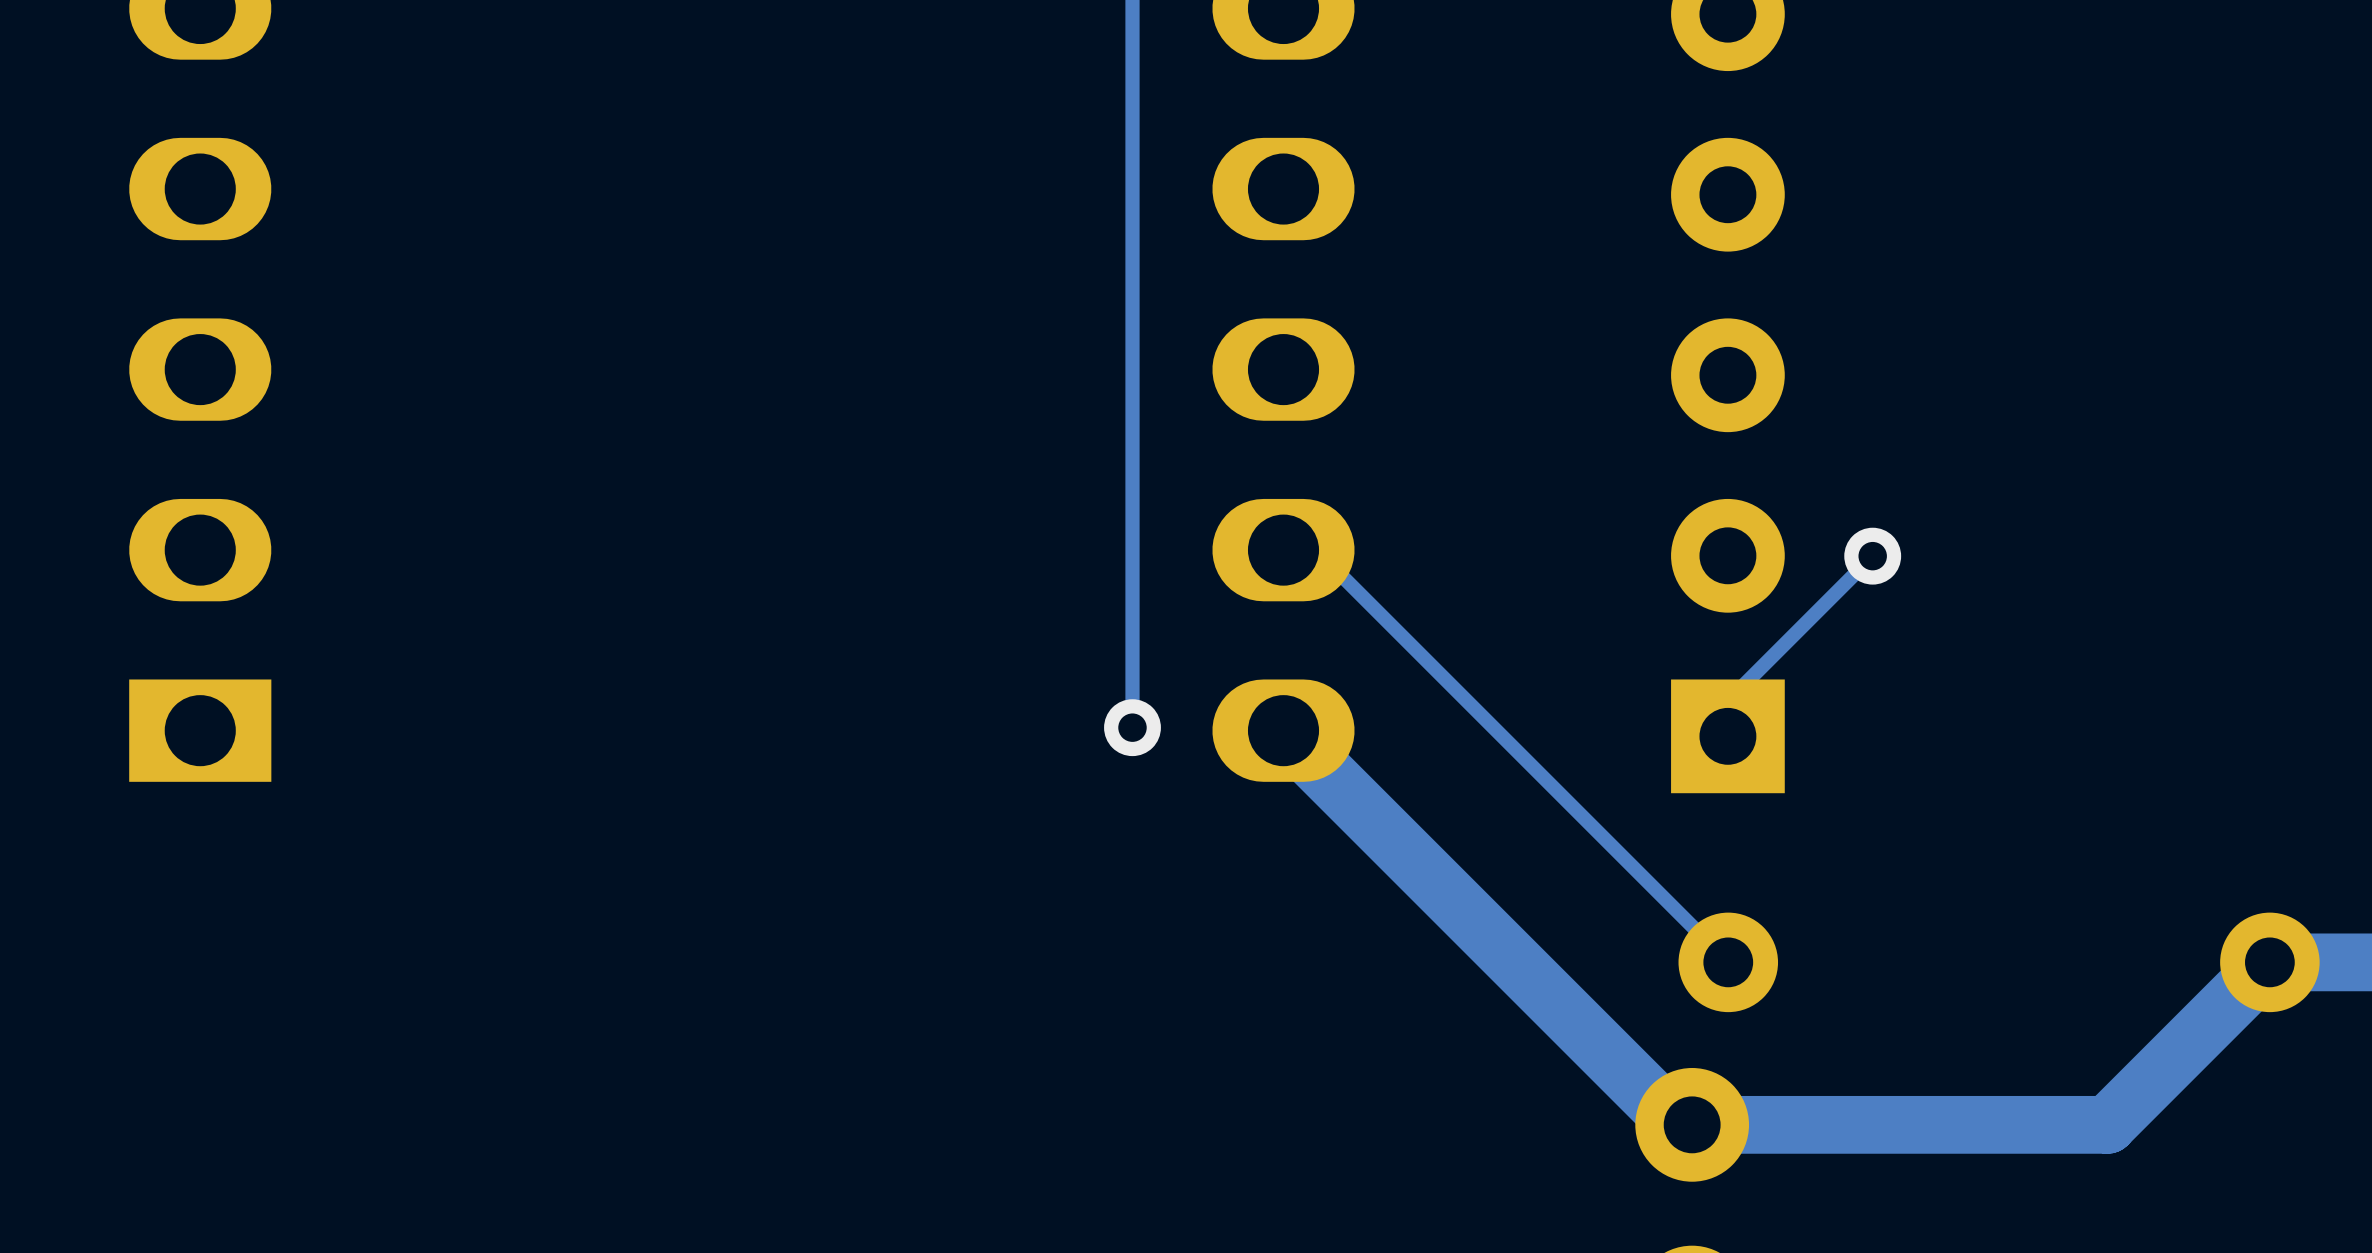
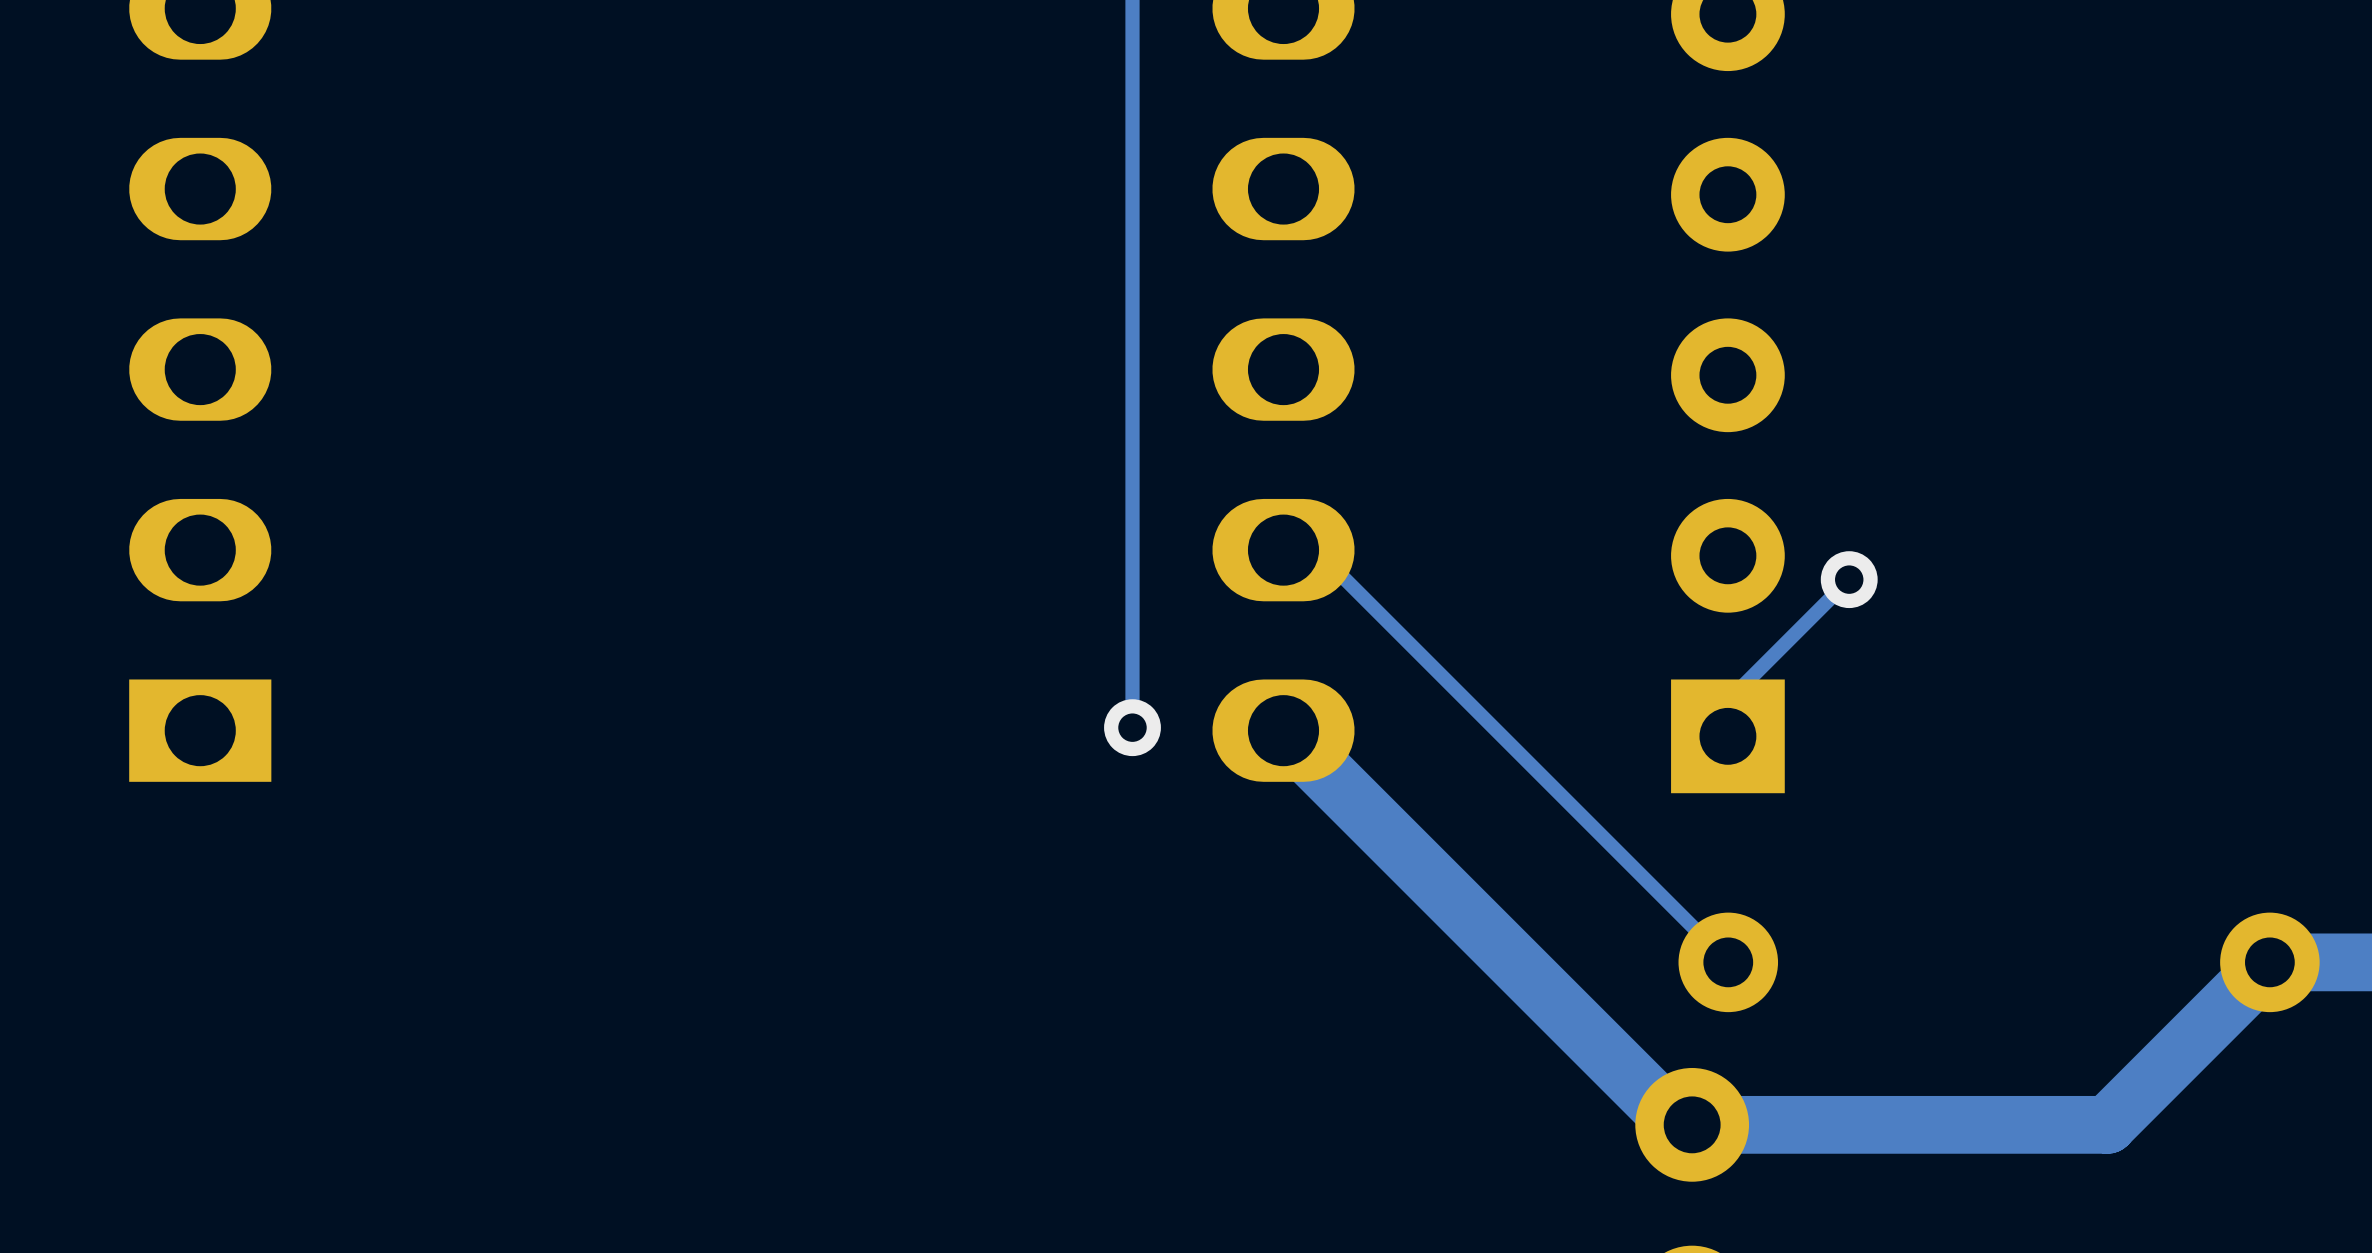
via position: (1872, 556) -> (1849, 579)

